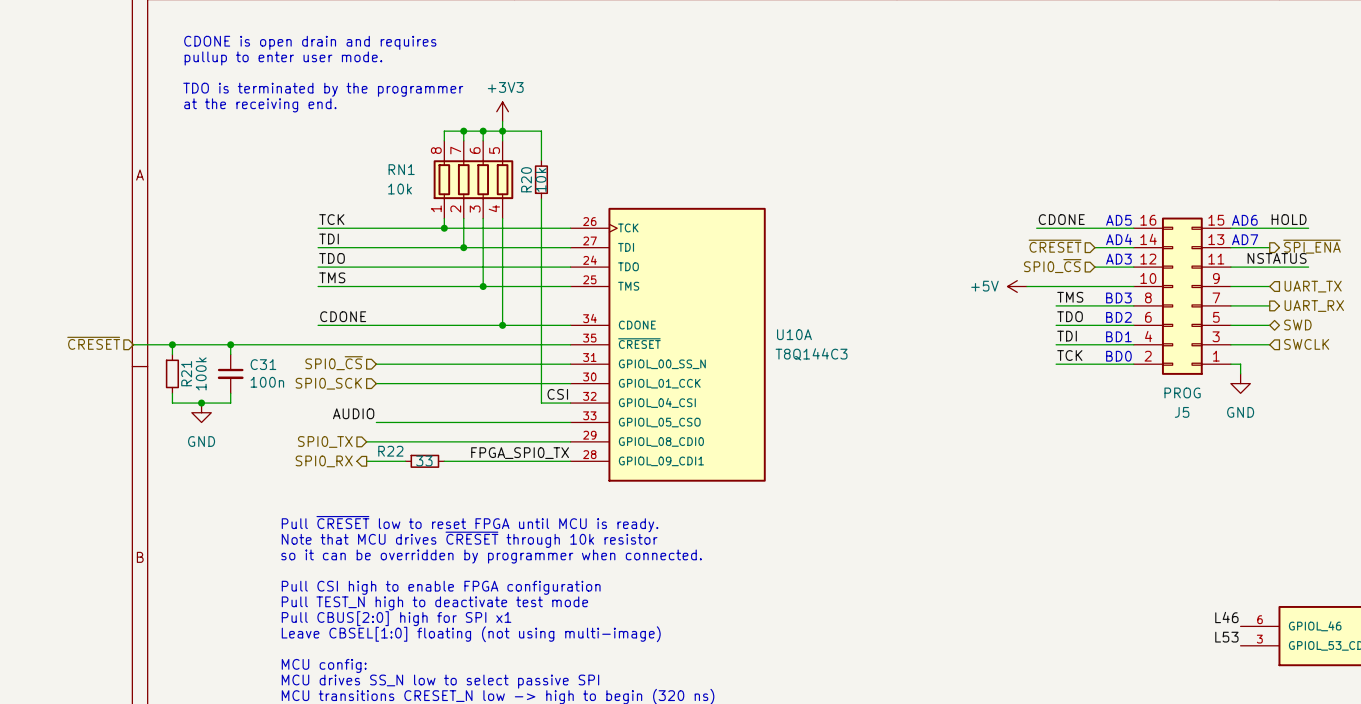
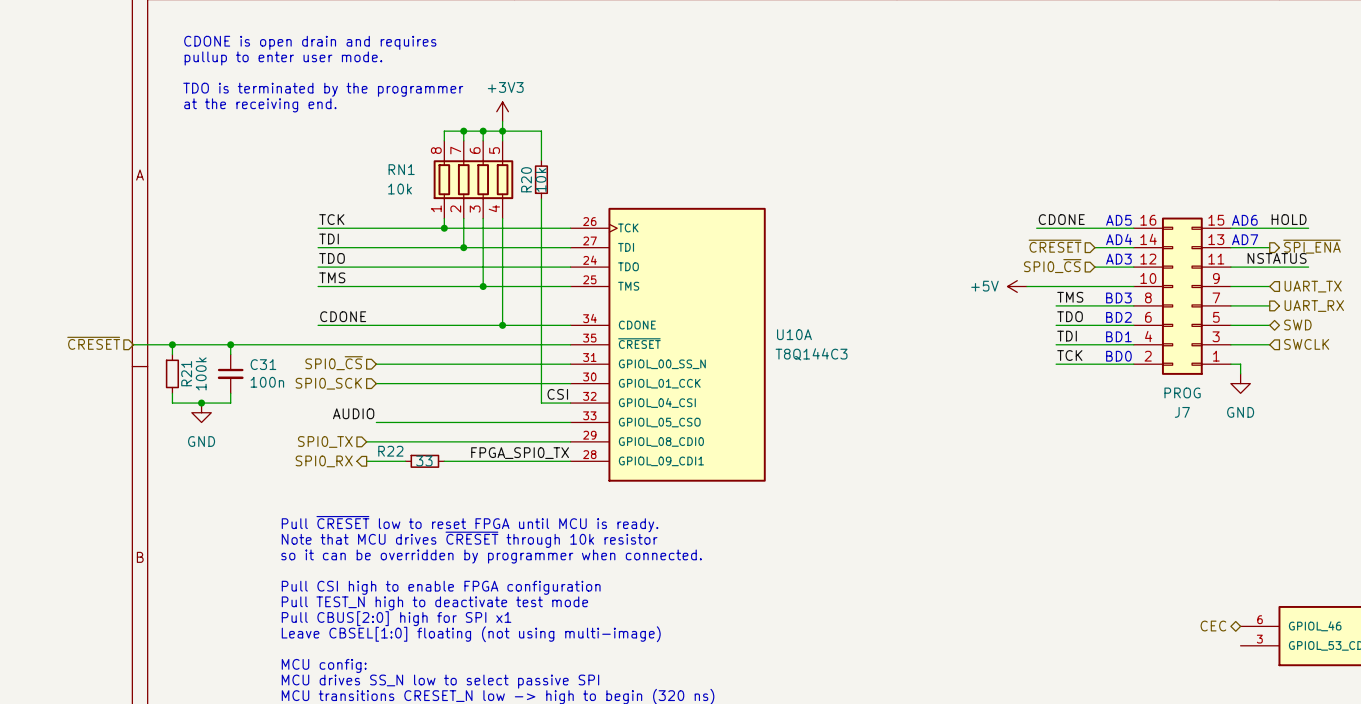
J5 name: J5 (1182, 412) -> J7 (1182, 412)
label: L46 (1226, 617) -> none
hierarchical label: none -> CEC (1213, 626)
label: L53 (1226, 637) -> none

